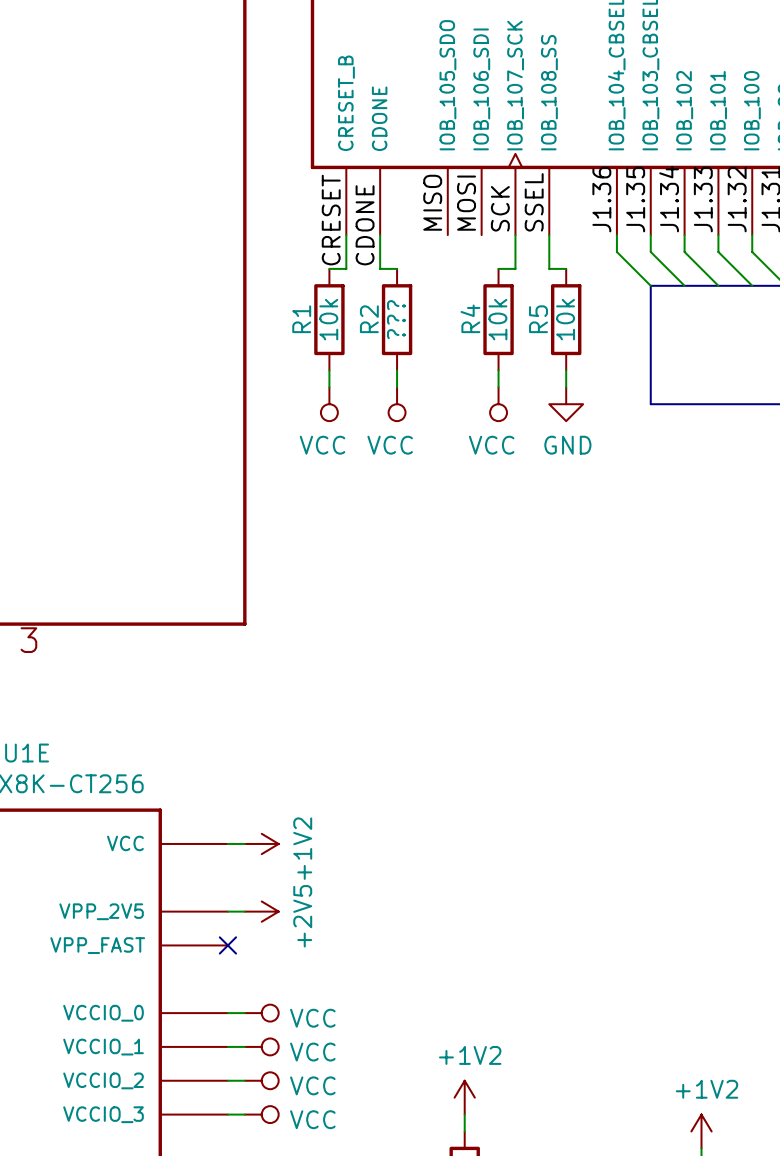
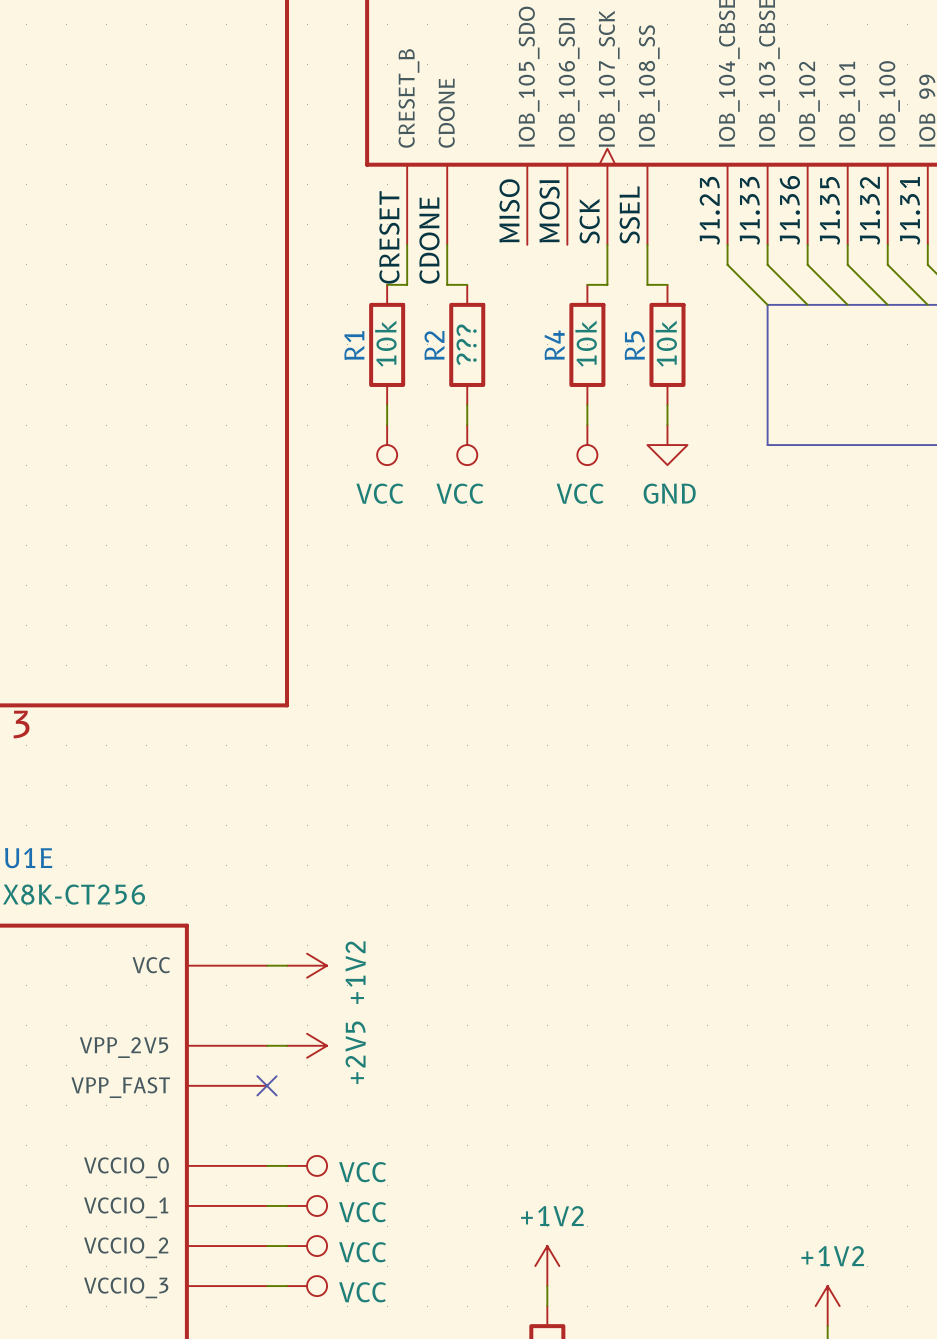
label: J1.36 (601, 199) -> J1.23 (709, 210)
label: J1.35 (635, 199) -> J1.33 (749, 210)
label: J1.34 (669, 199) -> J1.36 (789, 210)
label: J1.33 (703, 199) -> J1.35 (829, 210)

